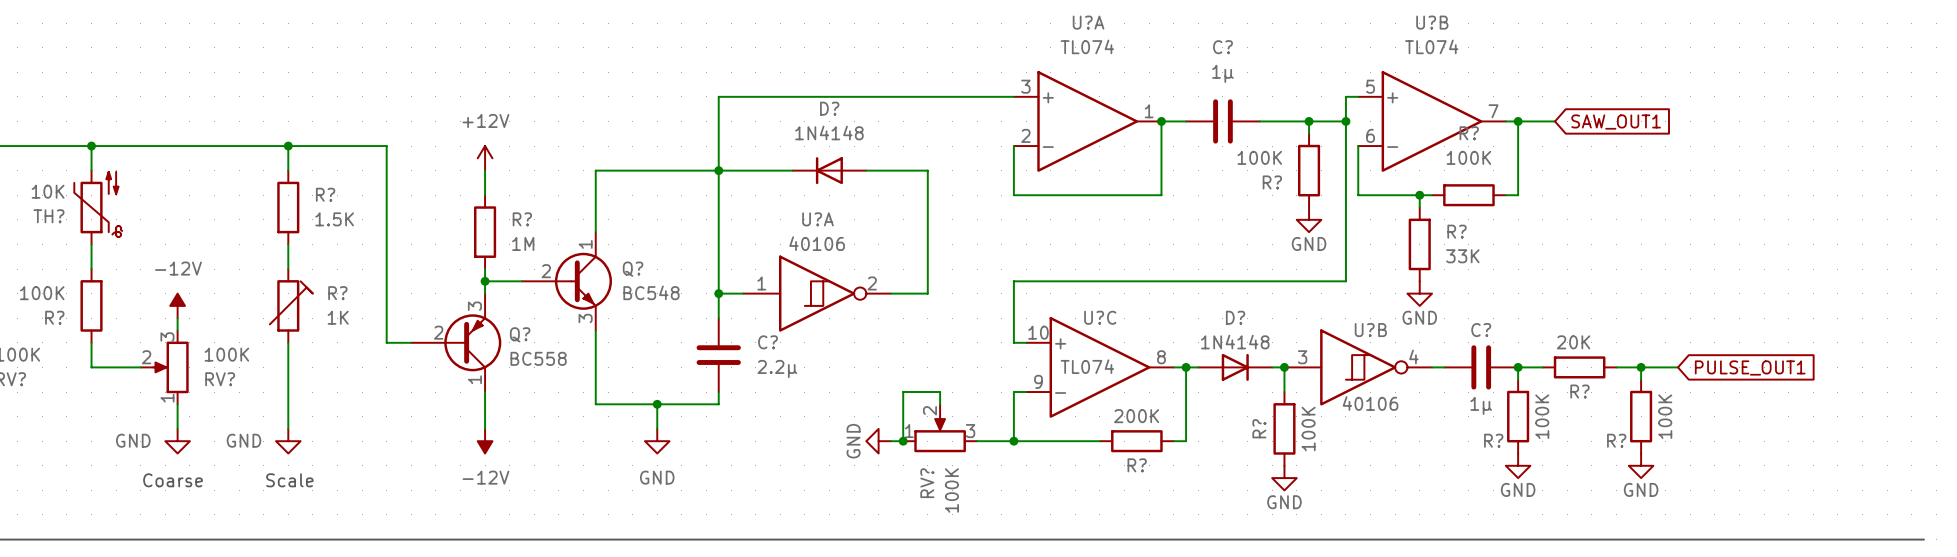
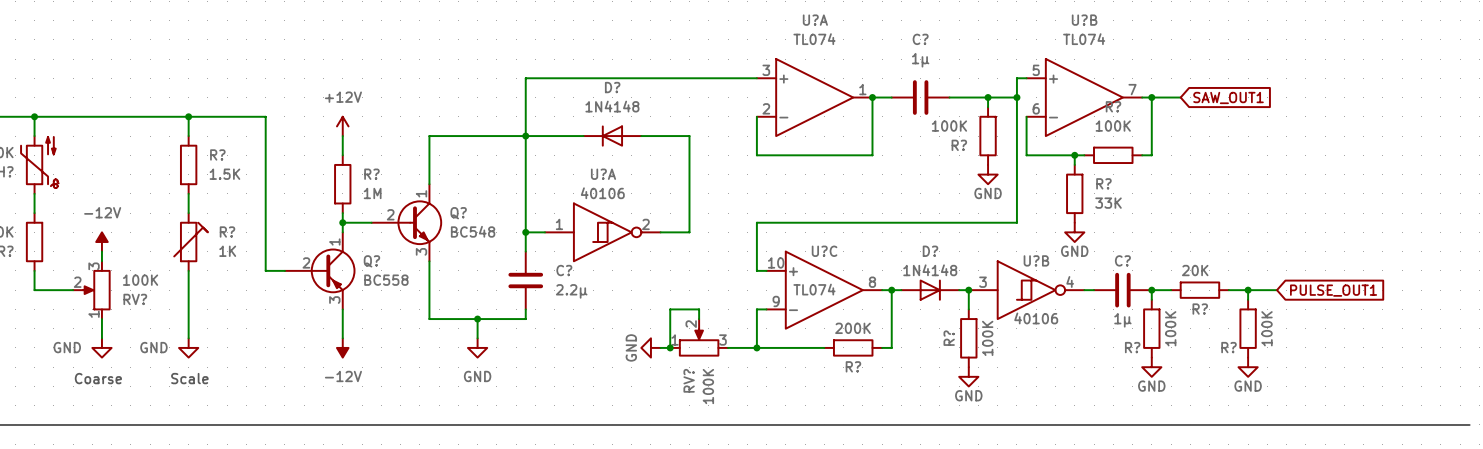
Q? flip: as is (472, 342) -> up-down (333, 270)

